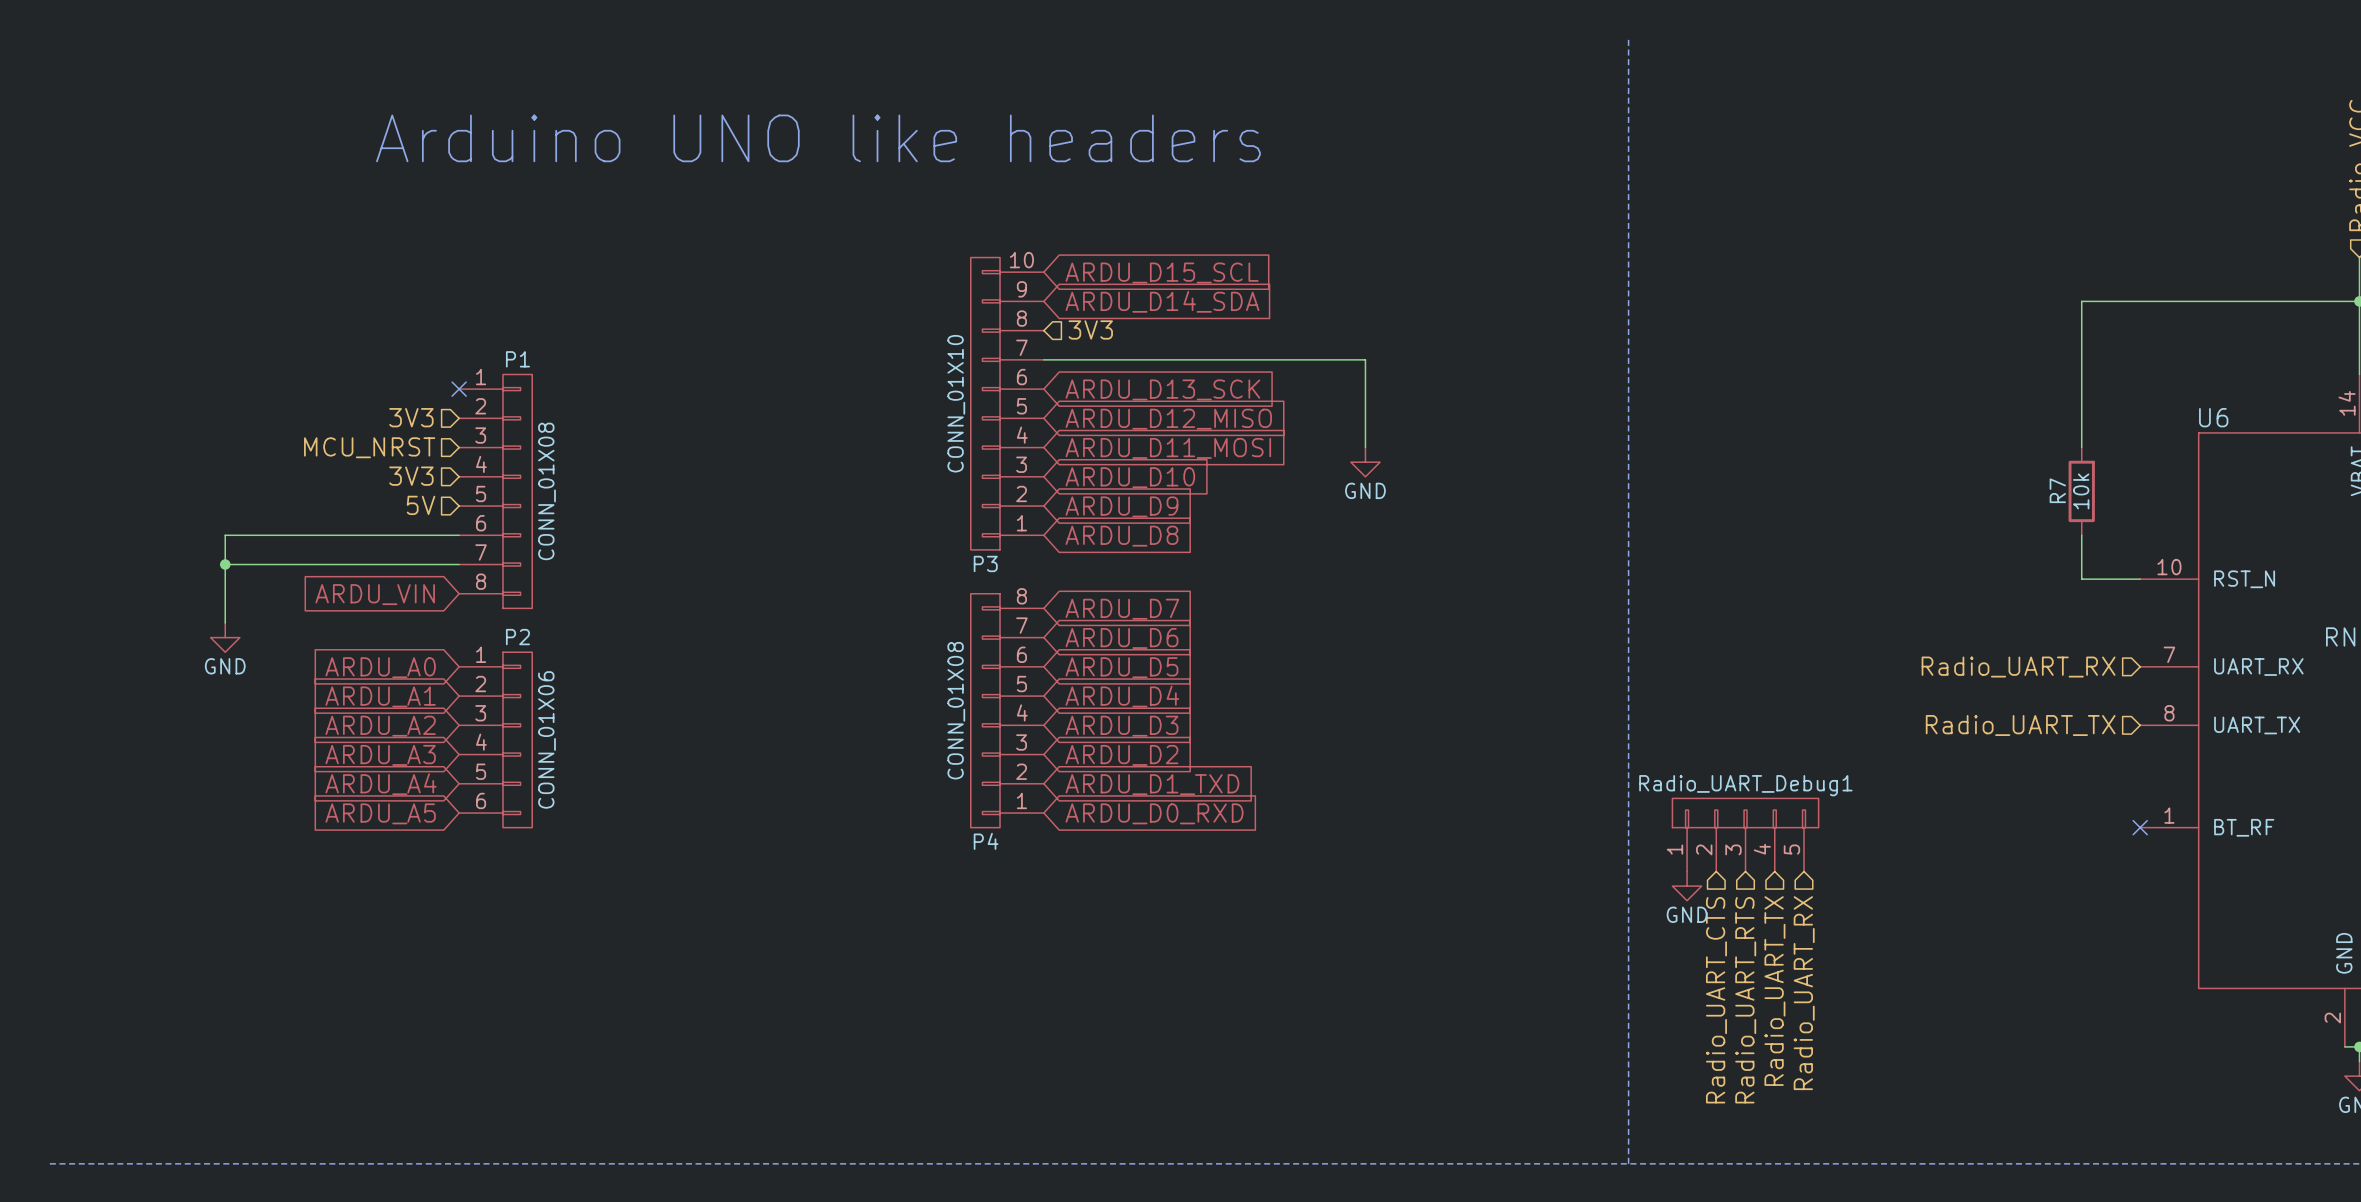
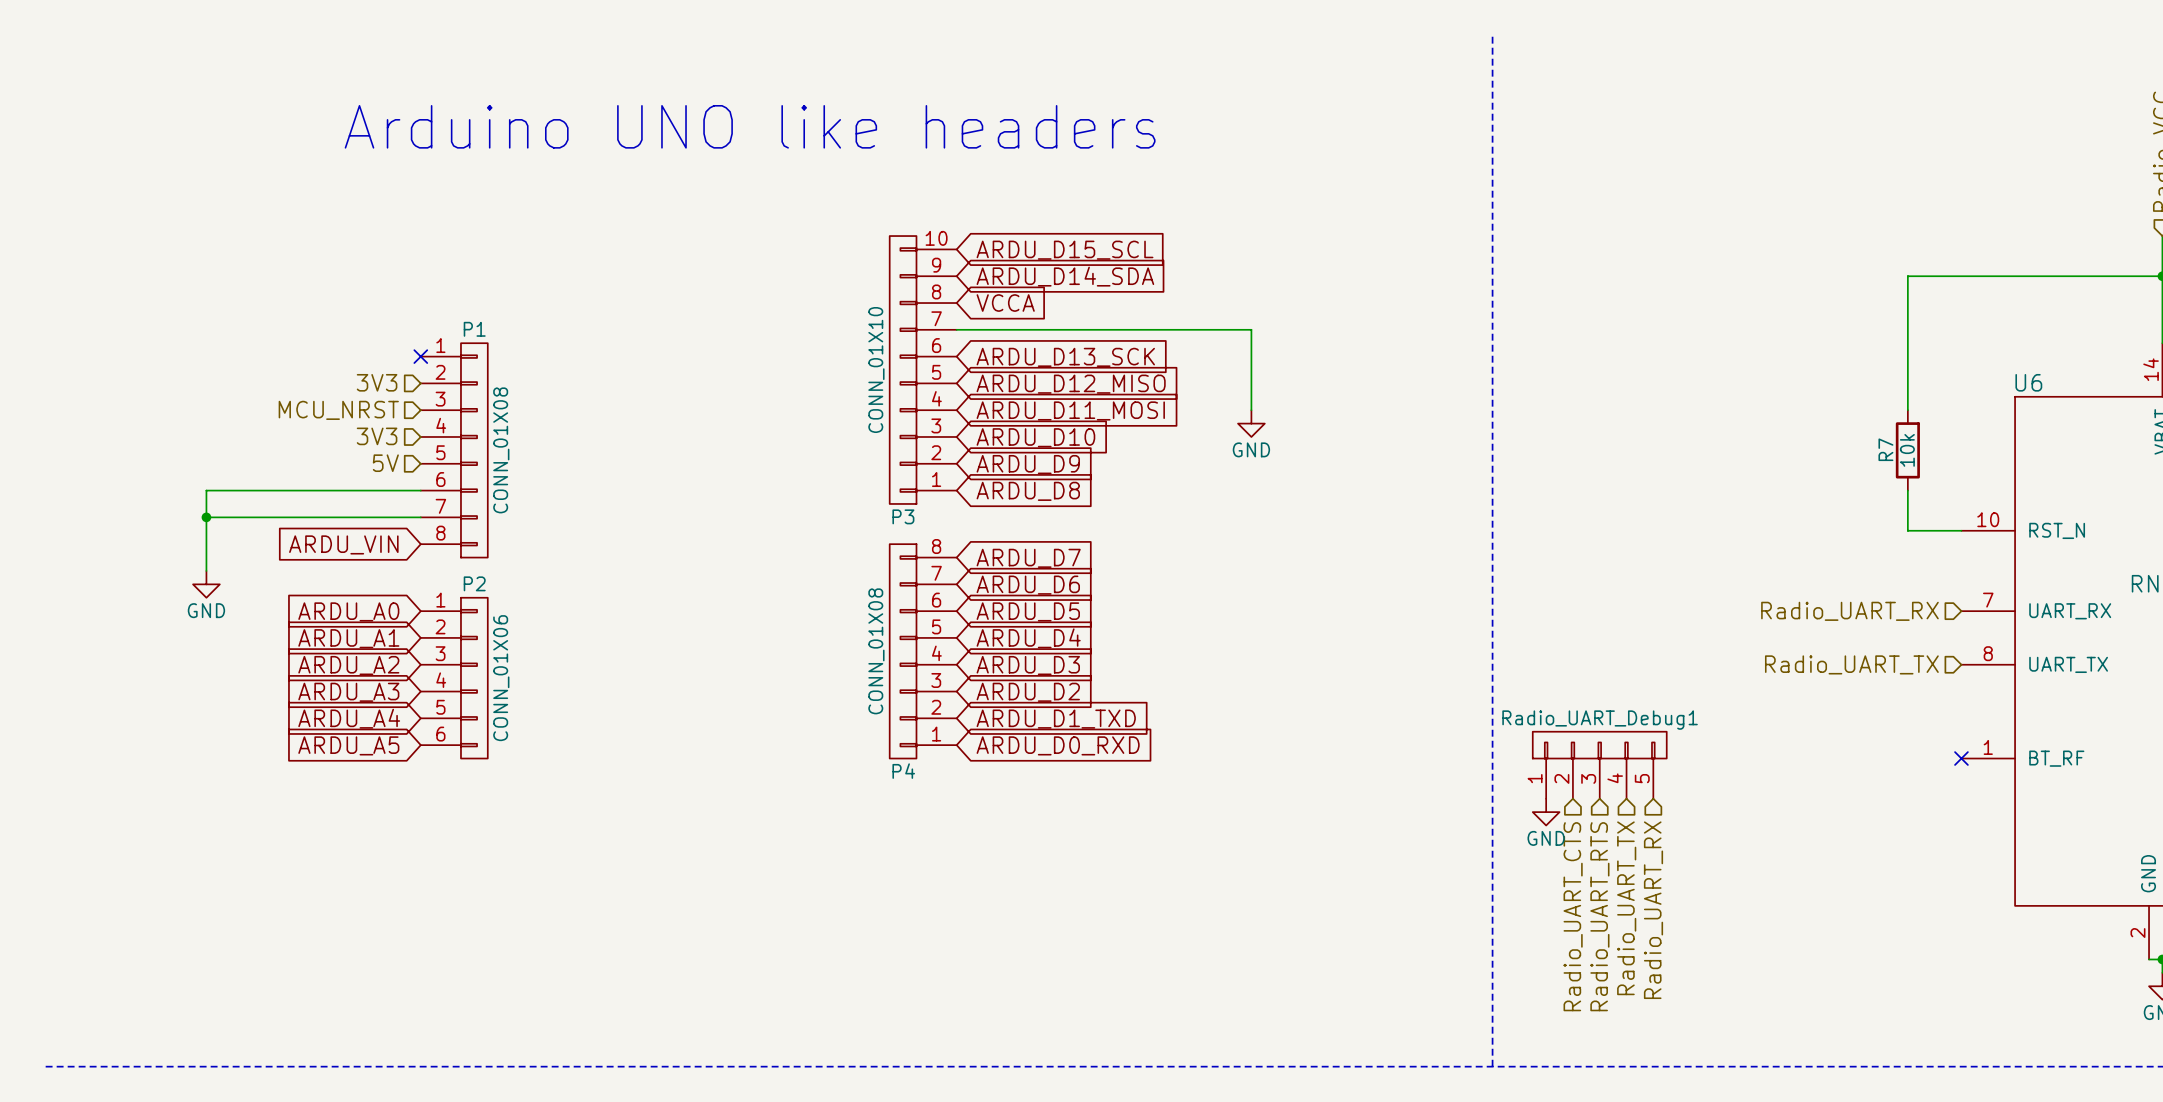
hierarchical label: 3V3 (1090, 329) -> none
global label: none -> VCCA (1005, 303)

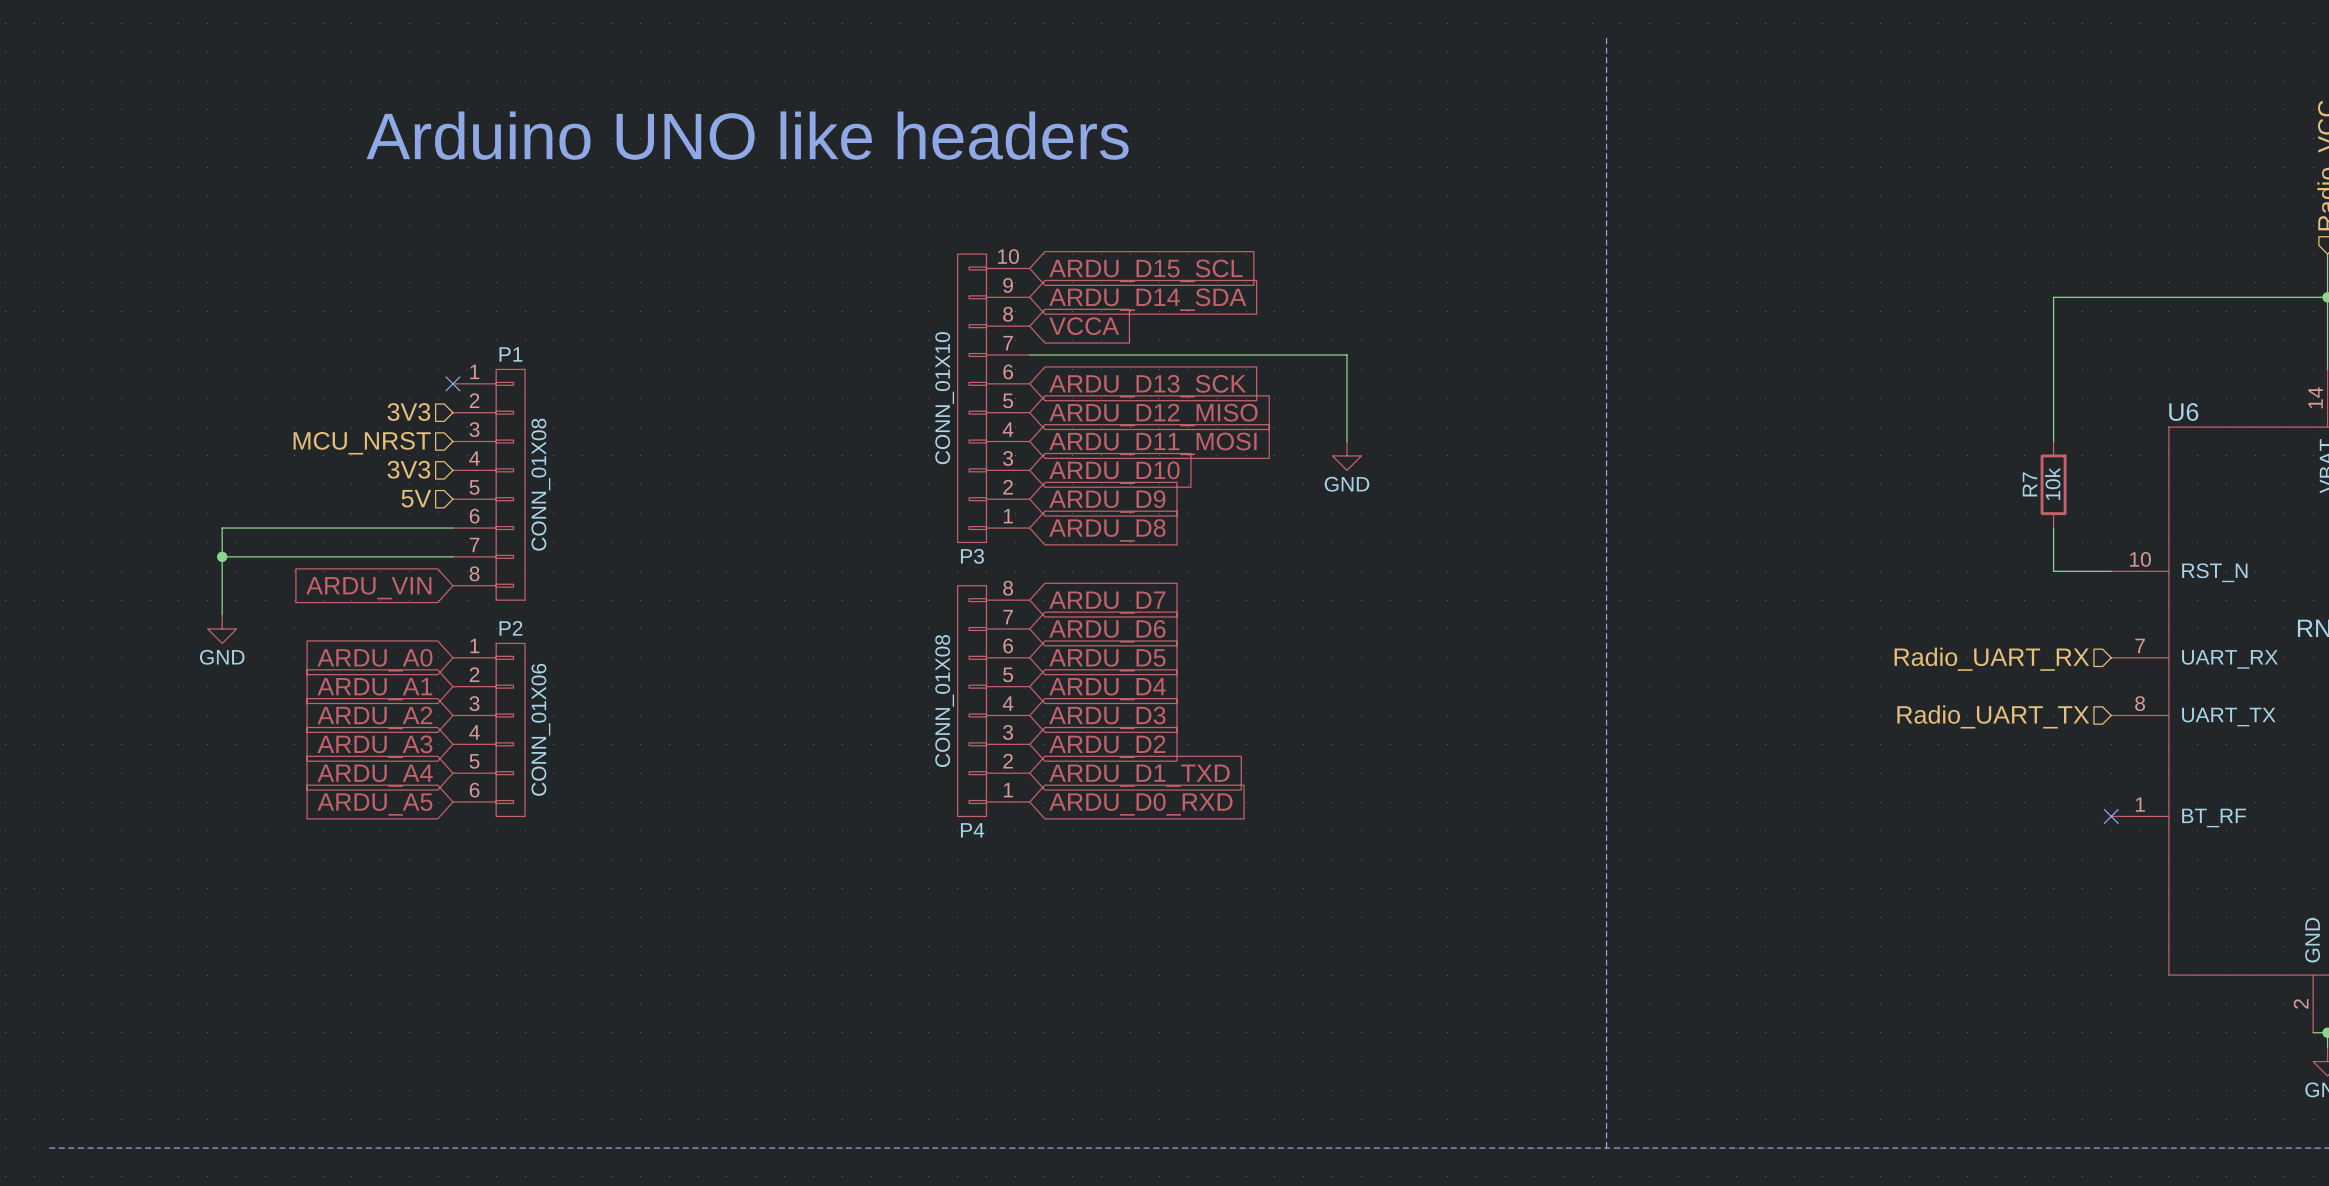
Radio_UART_Debug1: (1599, 765) -> none
power symbol: GND (1546, 812) -> none
hierarchical label: Radio_UART_TX (1626, 908) -> none
hierarchical label: Radio_UART_RX (1653, 910) -> none
hierarchical label: Radio_UART_CTS (1573, 916) -> none
hierarchical label: Radio_UART_RTS (1599, 916) -> none

